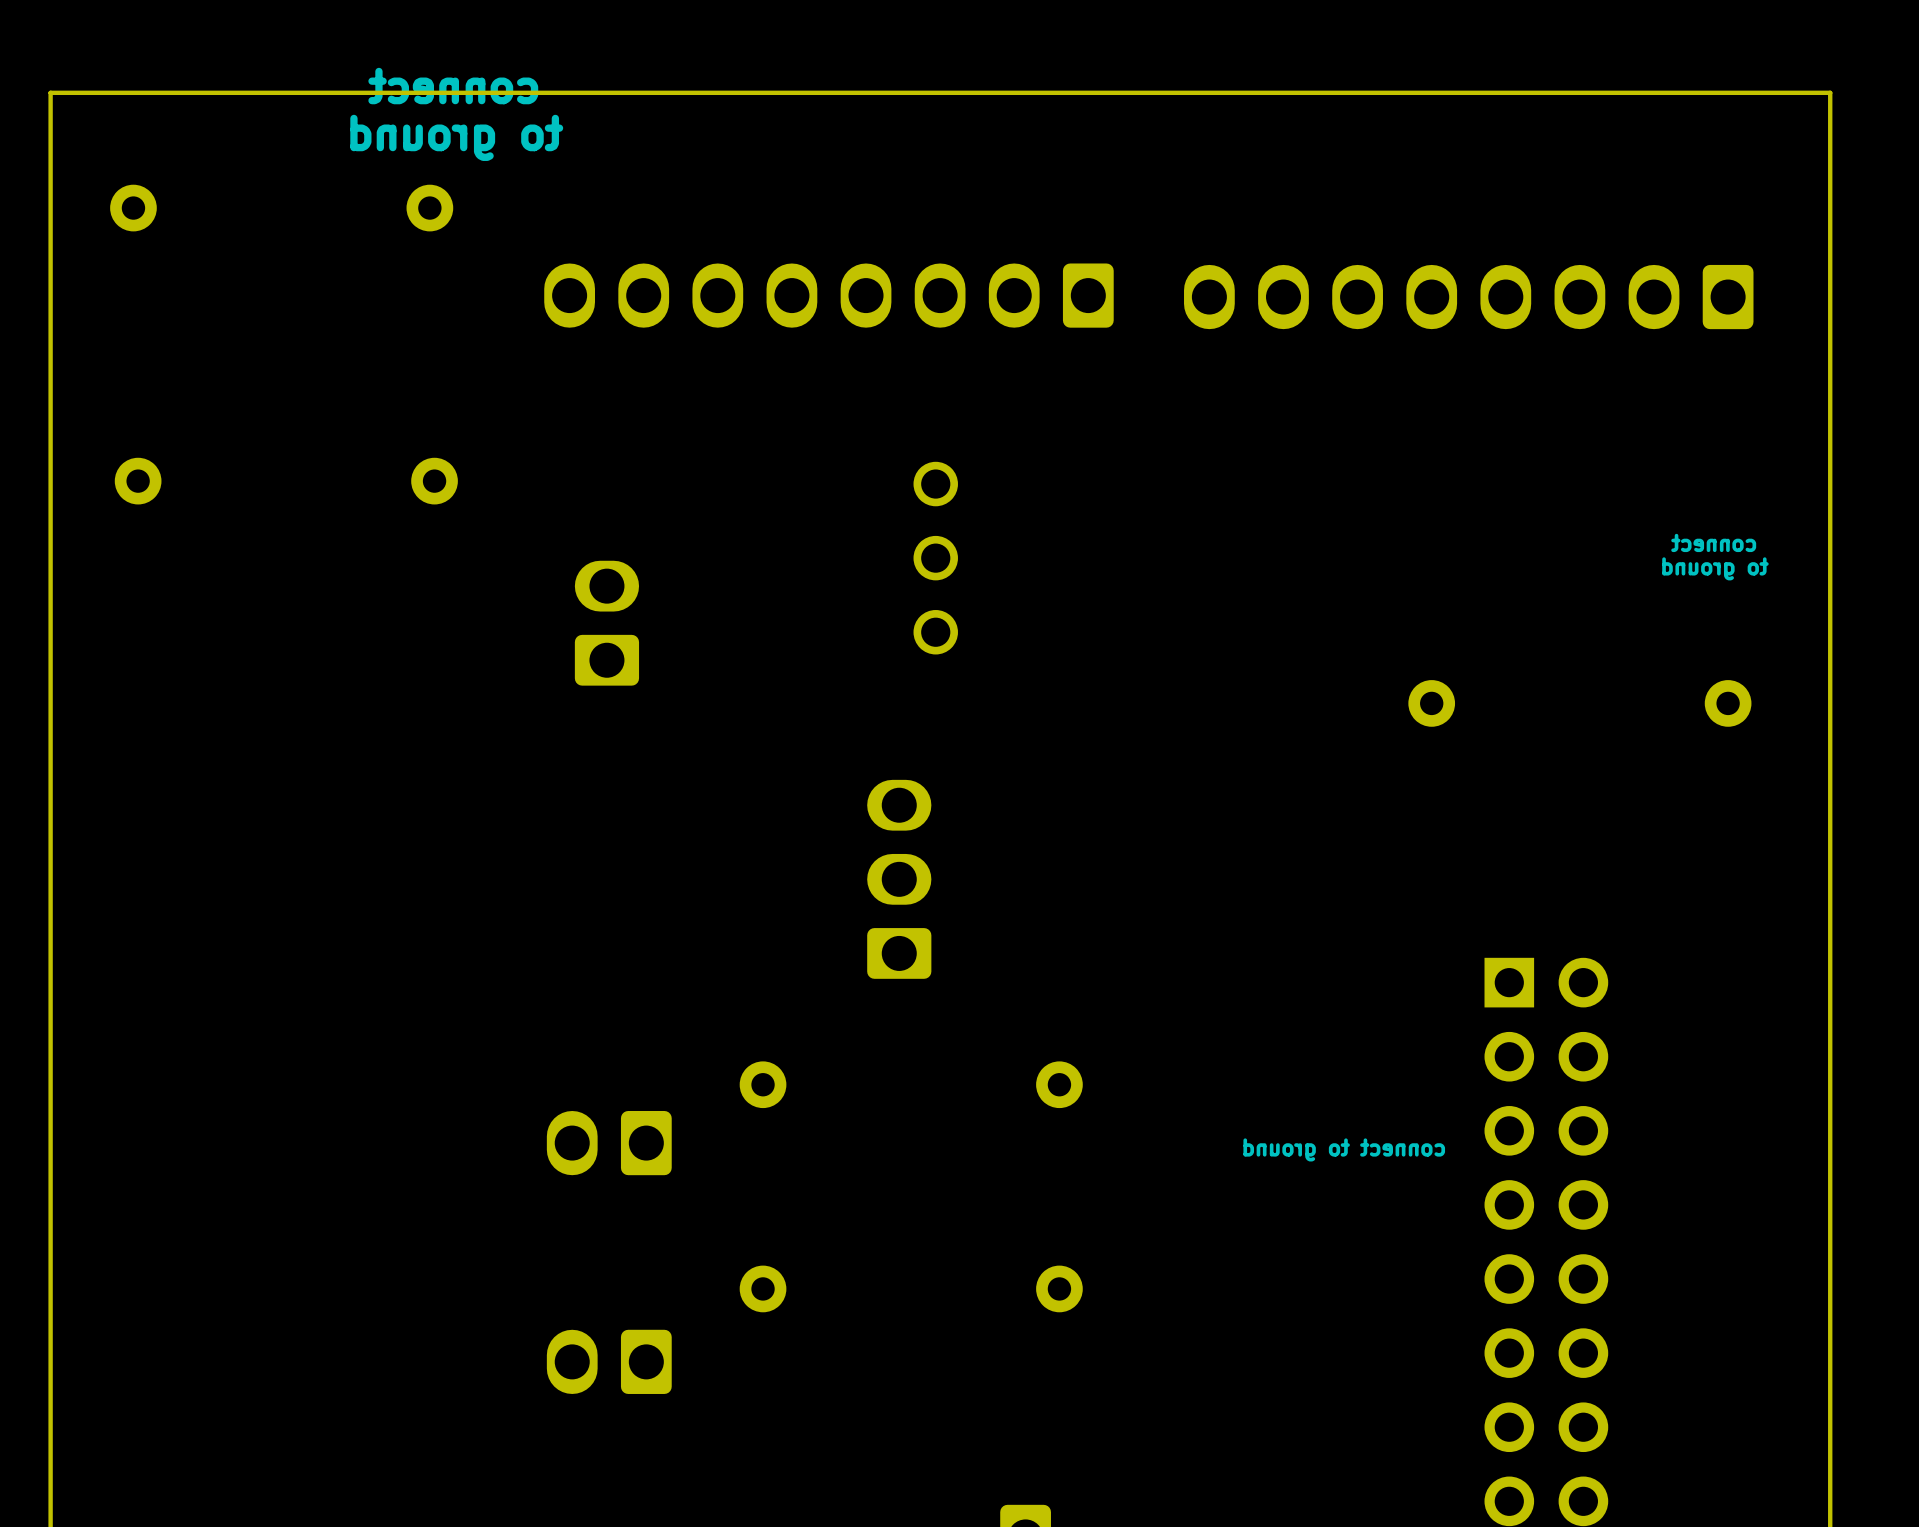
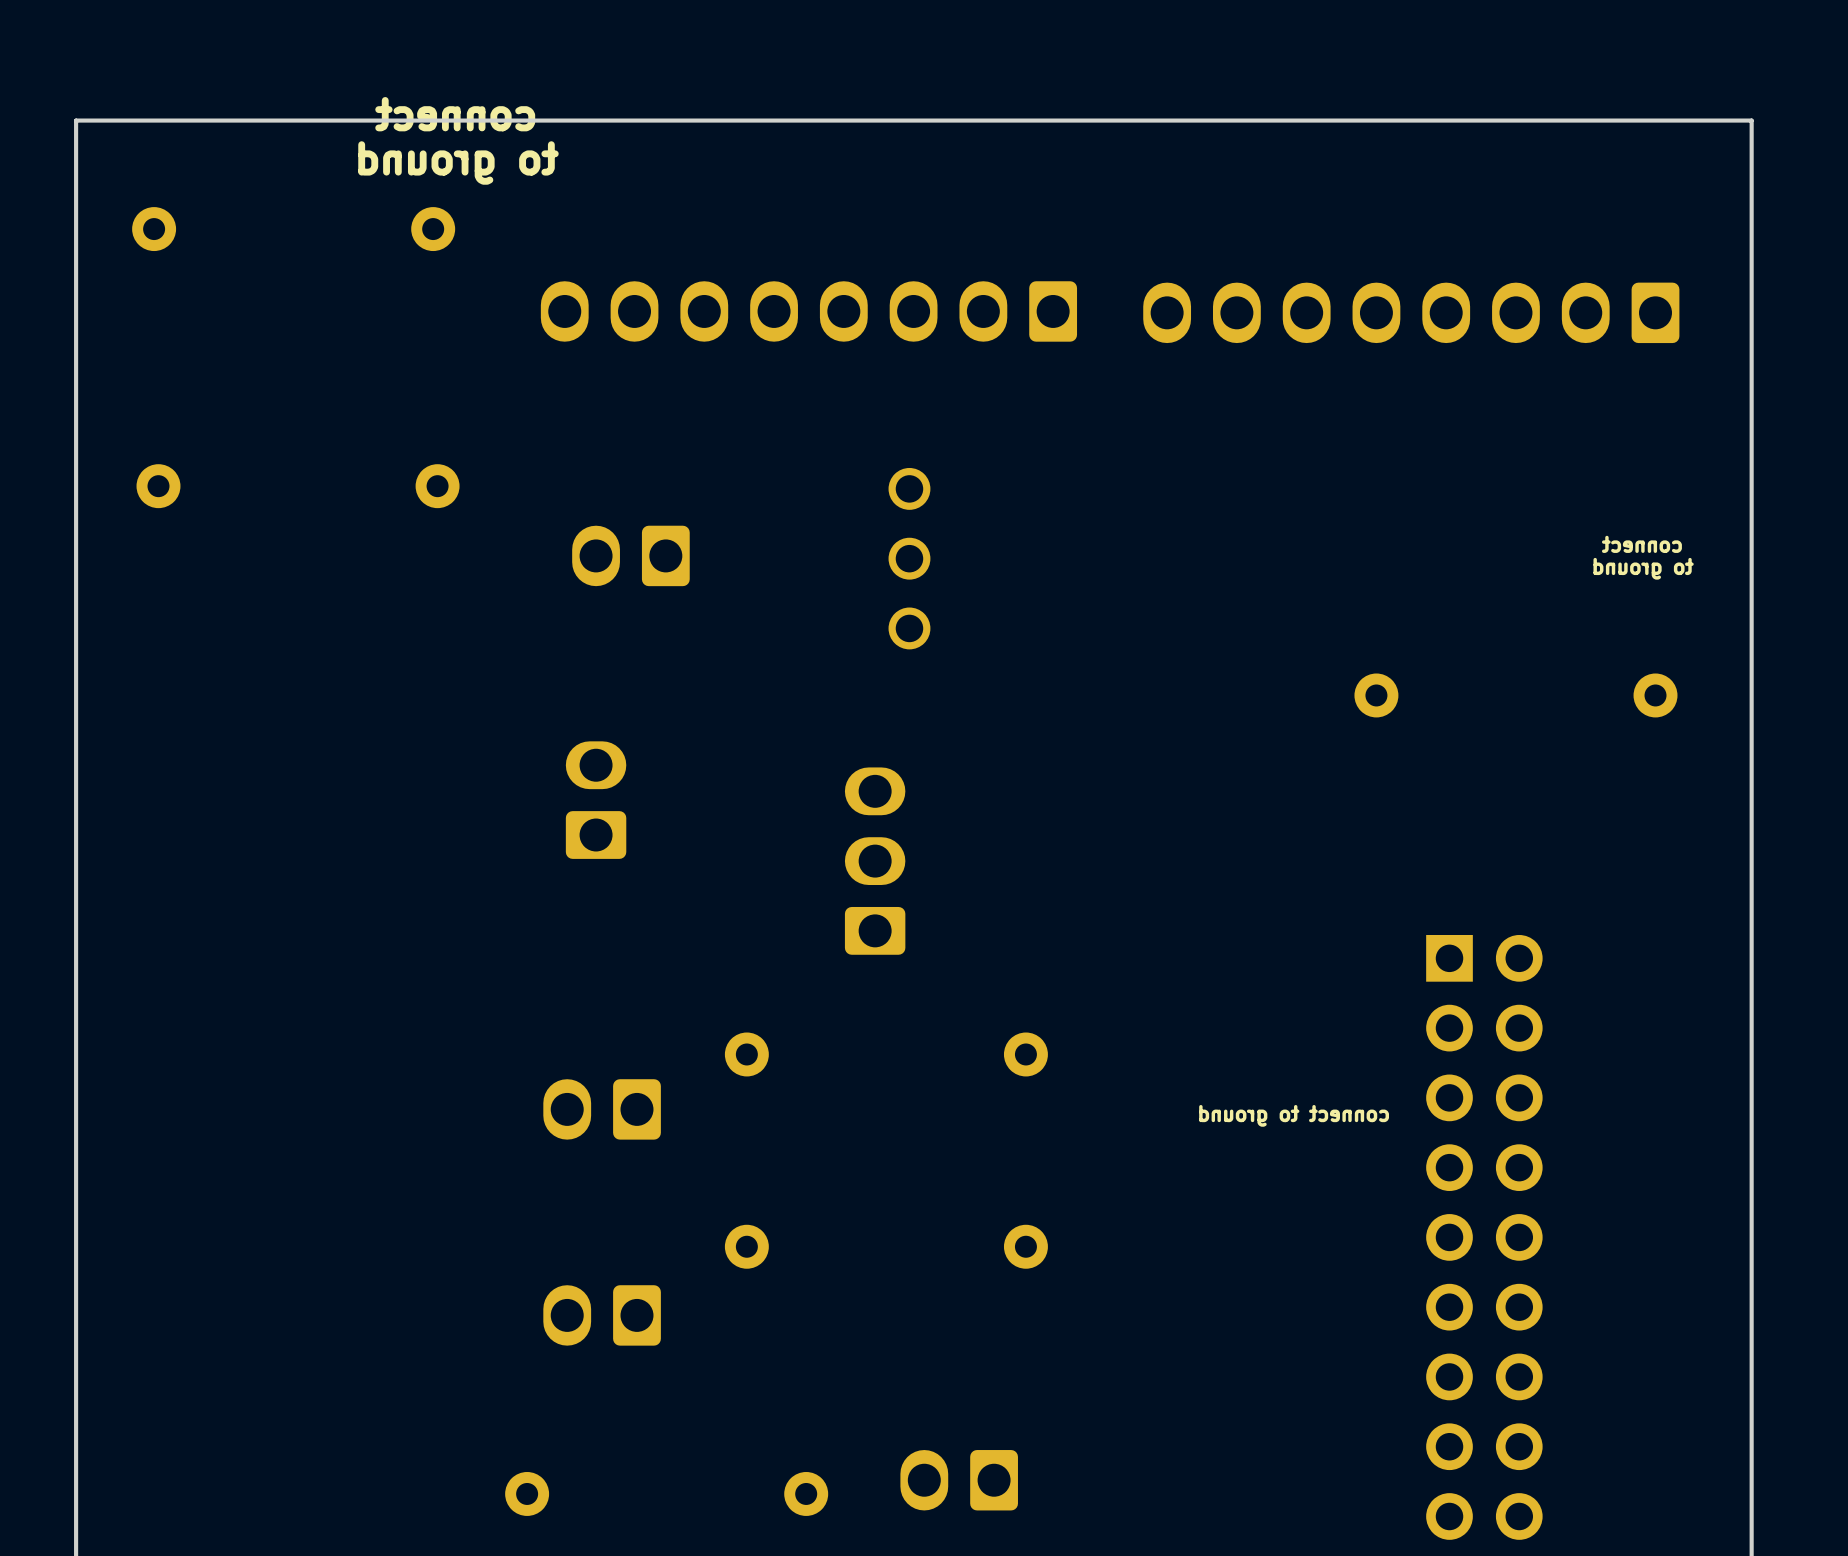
part rotation: 0° (606, 623) -> 90° counterclockwise (630, 555)
part position: (606, 623) -> (630, 555)
part: none -> (596, 800)

